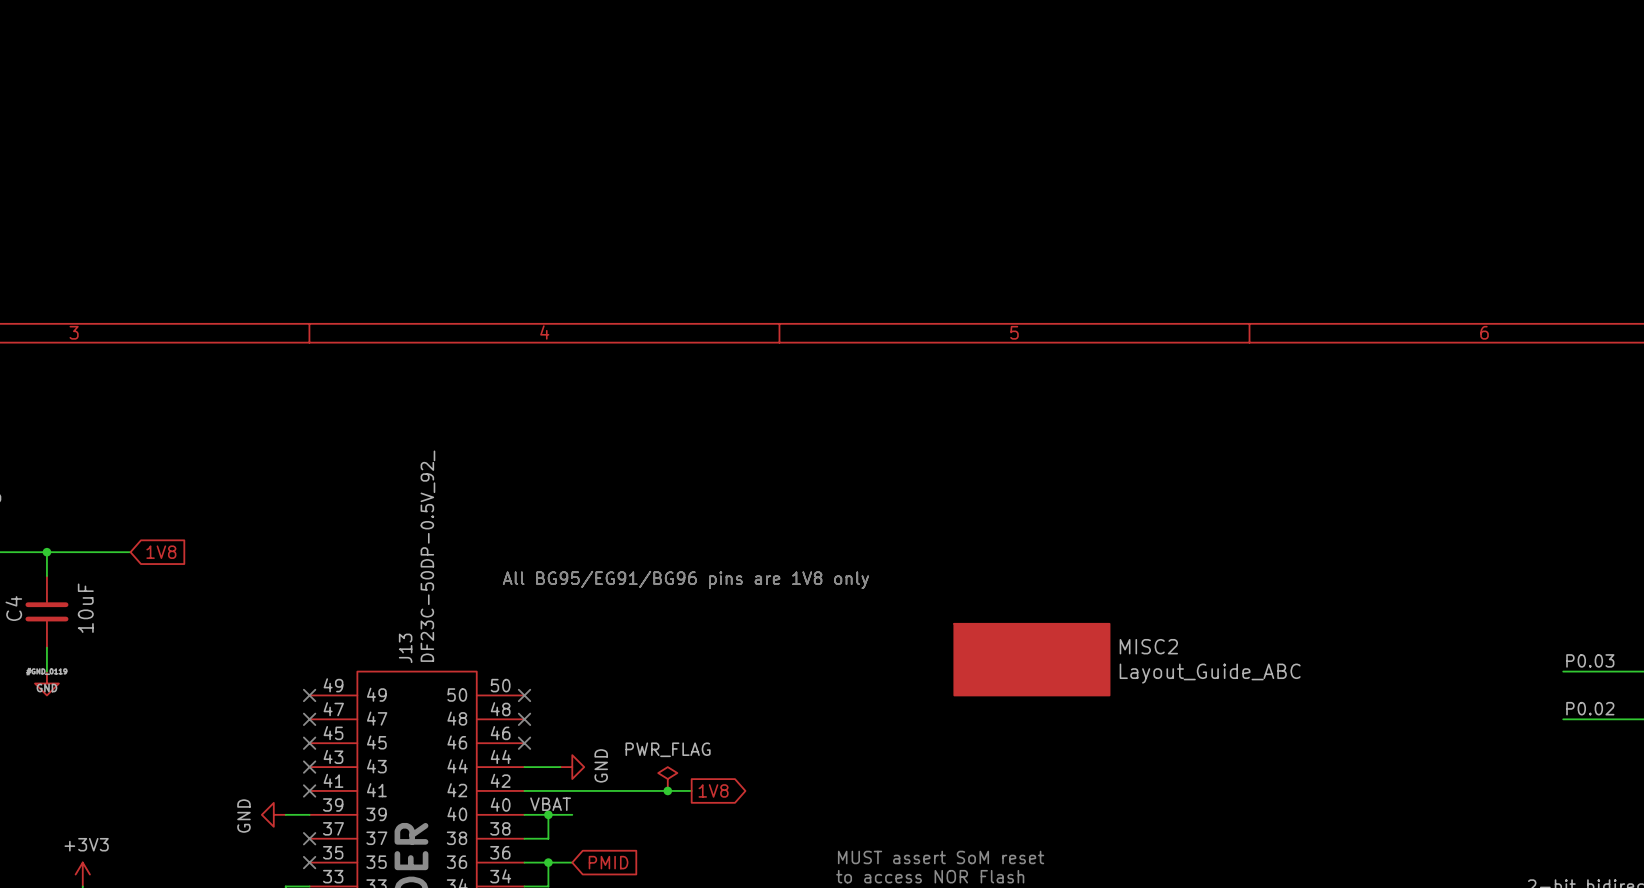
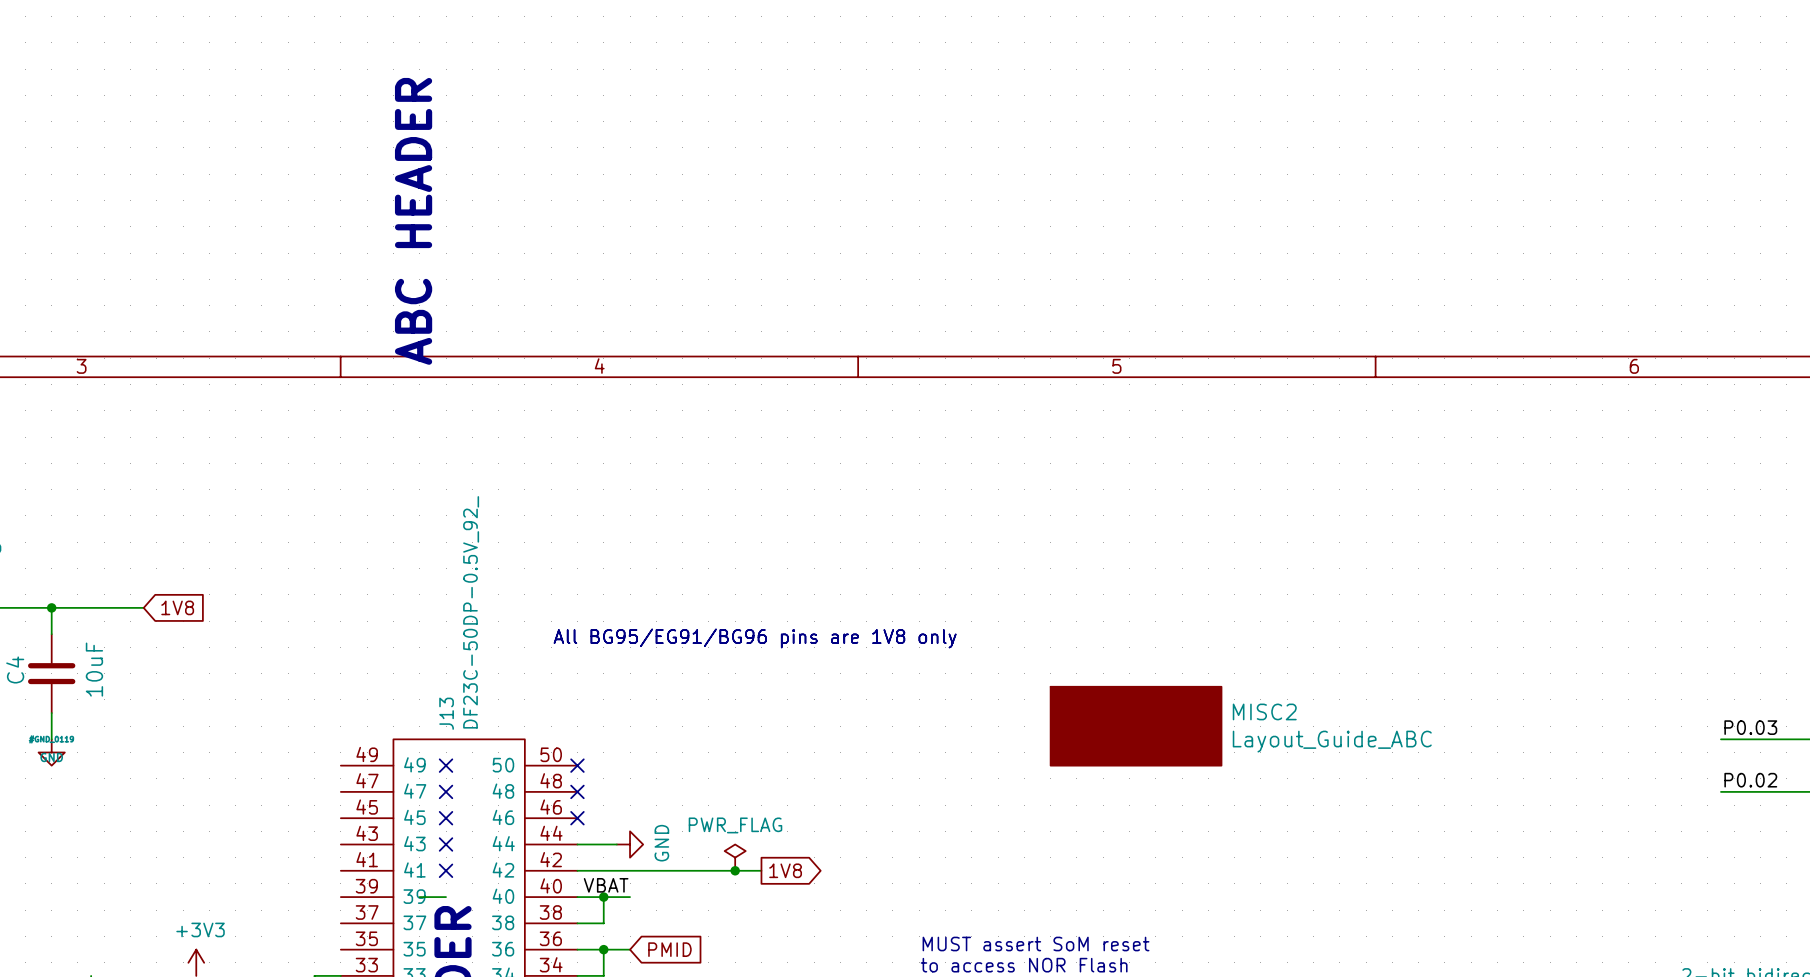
text: none -> ABC HEADER (413, 221)
no-connect mark: (309, 695) -> none
no-connect mark: none -> (446, 765)
no-connect mark: (309, 719) -> none
no-connect mark: none -> (446, 791)
no-connect mark: (309, 743) -> none
no-connect mark: none -> (446, 818)
no-connect mark: (309, 767) -> none
no-connect mark: none -> (446, 844)
no-connect mark: (309, 790) -> none
no-connect mark: none -> (446, 870)
power symbol: GND (273, 814) -> none
wire: (285, 814) (309, 814) -> (419, 897) (446, 897)
no-connect mark: (309, 838) -> none
no-connect mark: (309, 862) -> none
power symbol position: +3V3 (82, 874) -> +3V3 (196, 962)

